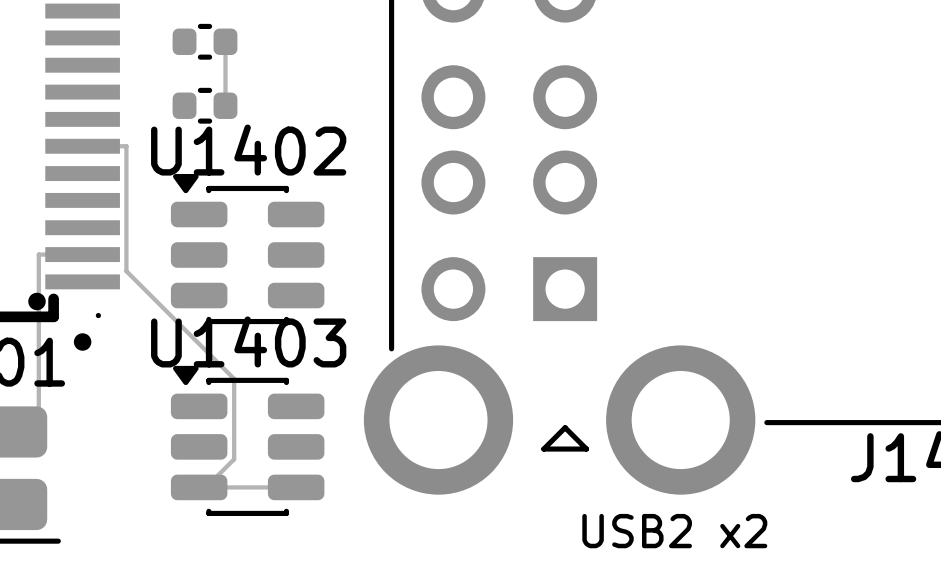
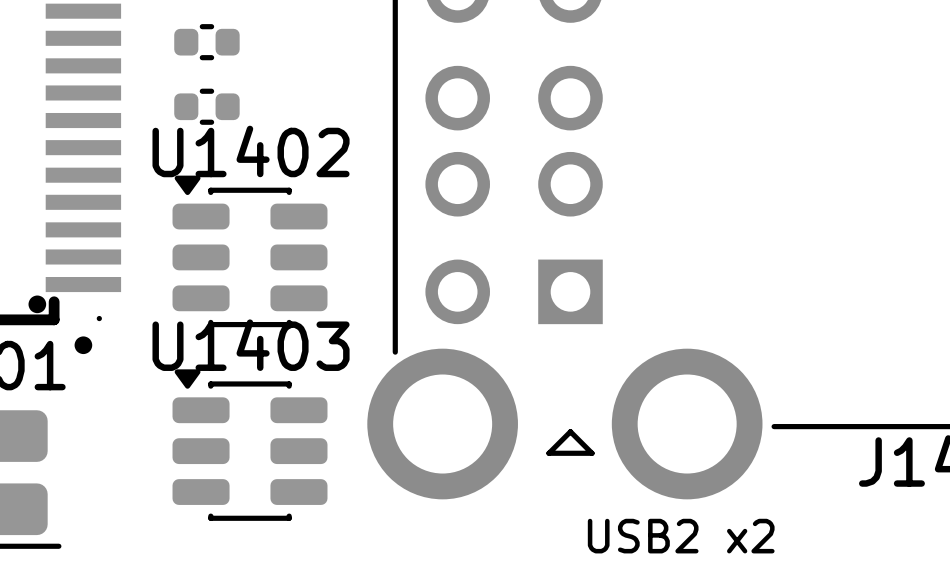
track: (225, 41) (225, 105) -> none
track: (82, 146) (126, 146) (126, 271) (234, 378) (234, 459) (206, 487) -> none
track: (82, 254) (38, 254) (38, 410) (17, 431) -> none
track: (199, 487) (296, 487) -> none

